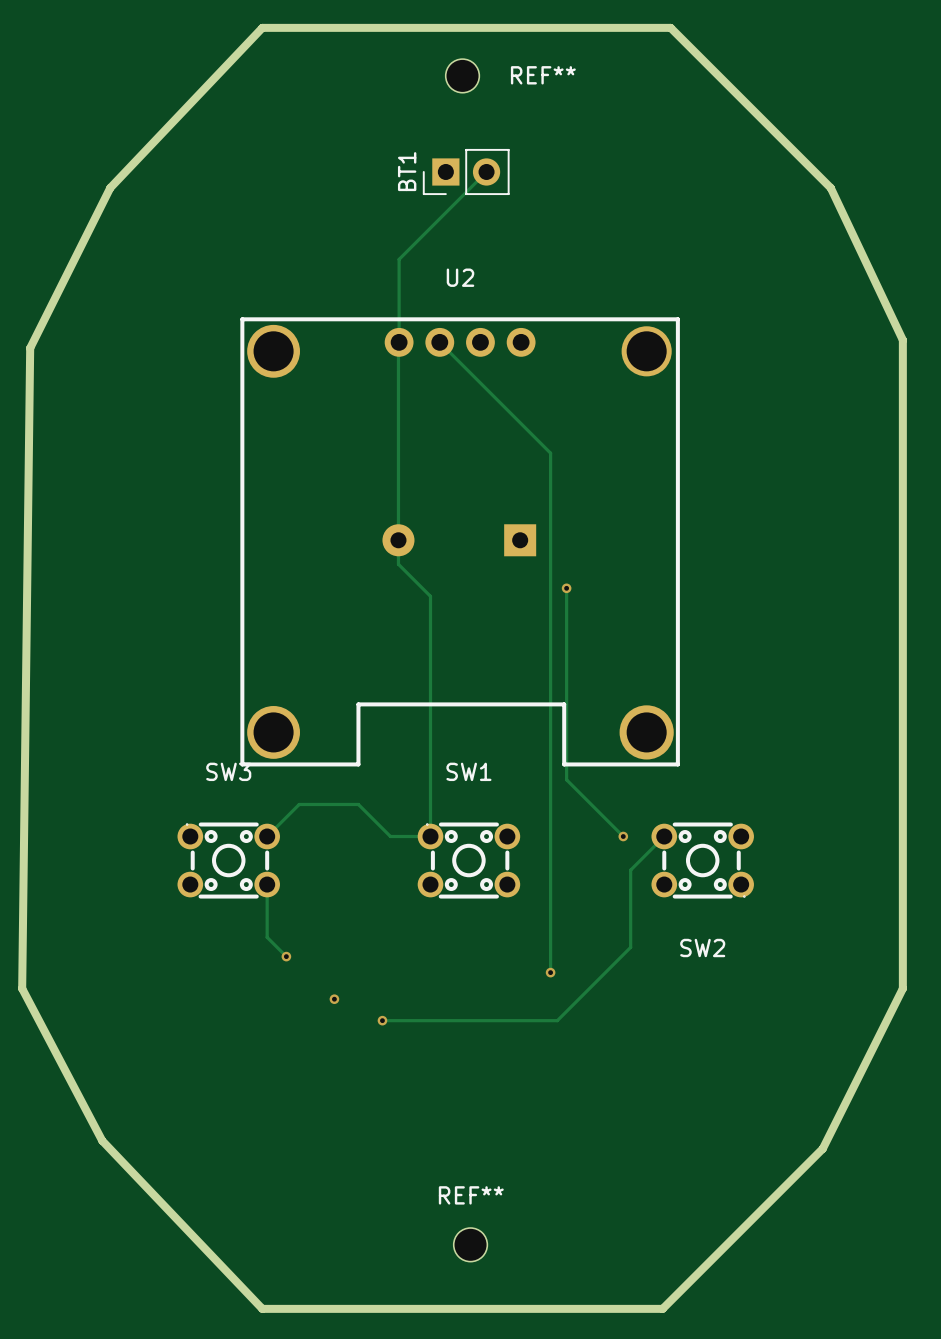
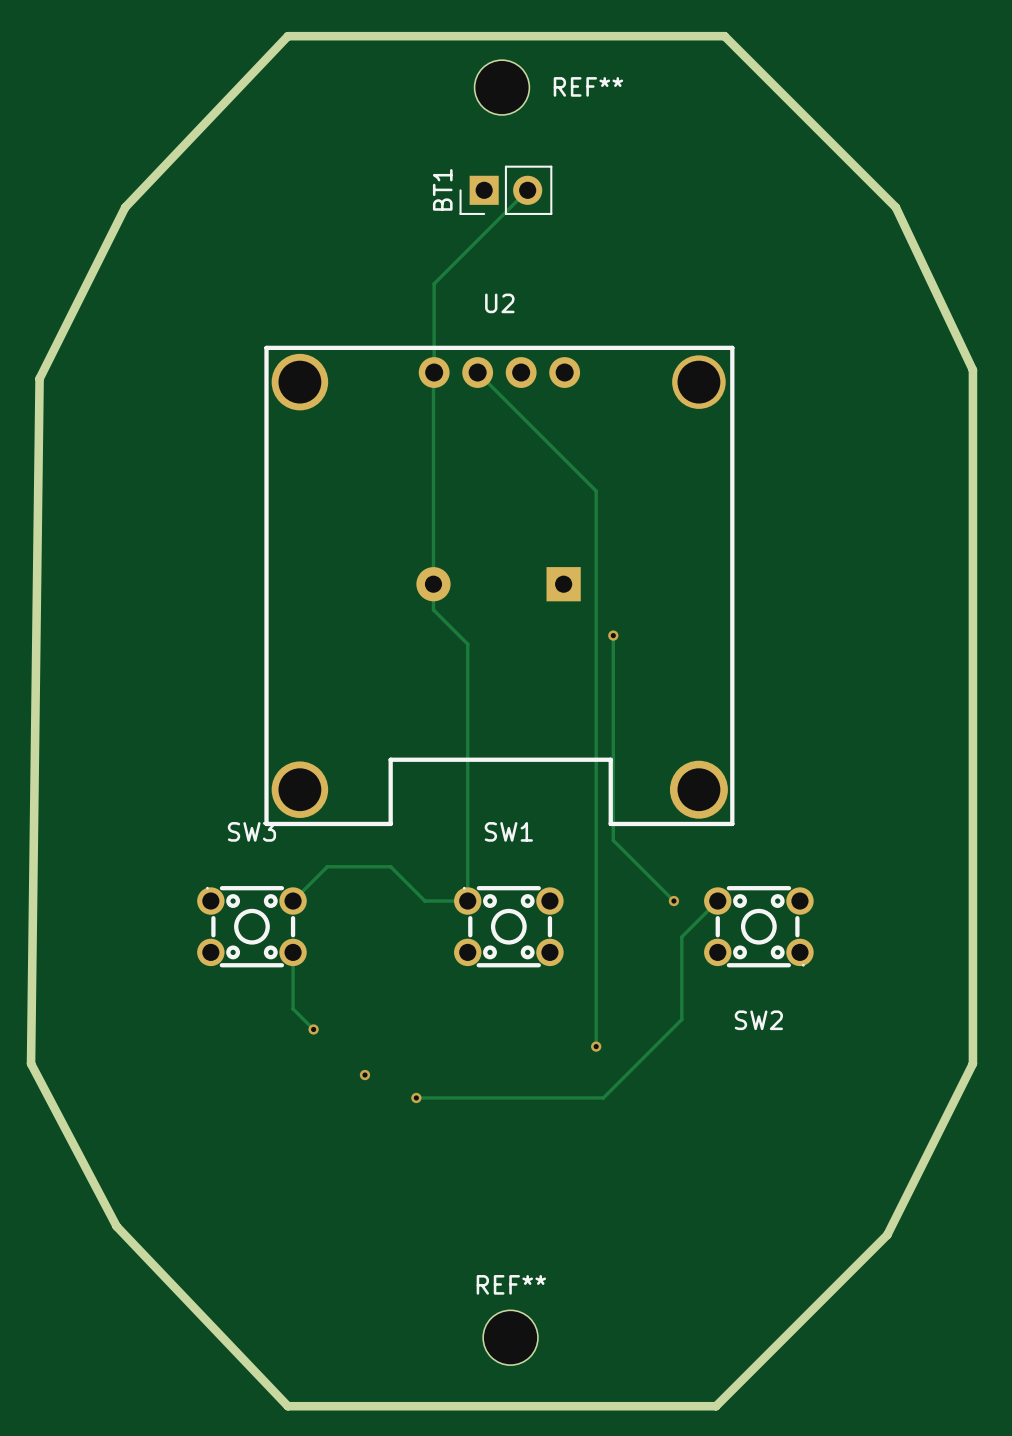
REF** footprint: [445, 59, 480, 93] -> [474, 60, 530, 115]
REF** footprint: [453, 1228, 488, 1262] -> [483, 1310, 538, 1366]

